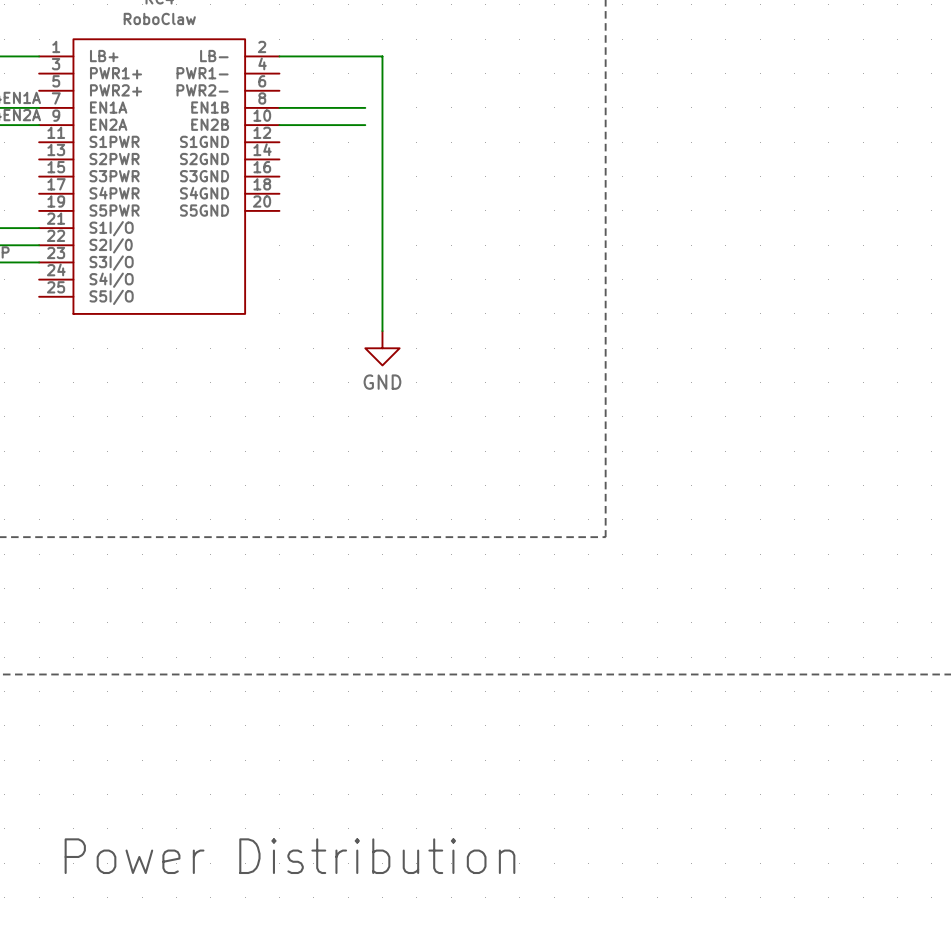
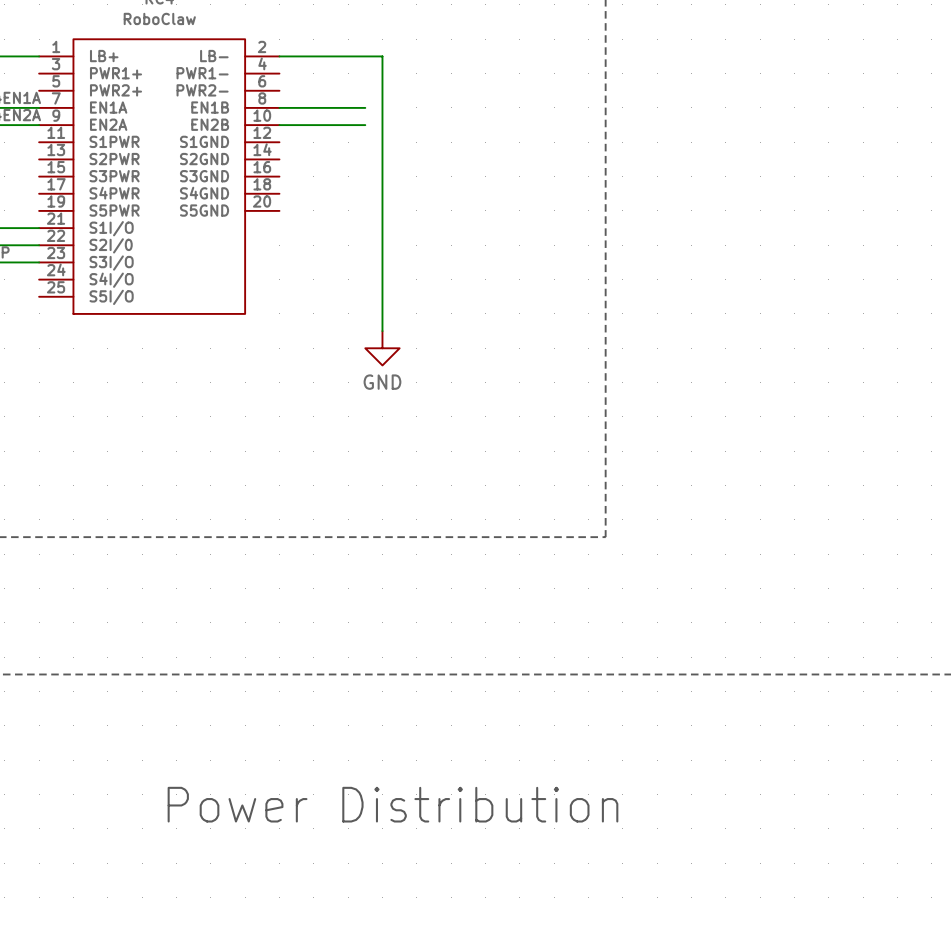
text position: Power Distribution (289, 856) -> Power Distribution (392, 804)

